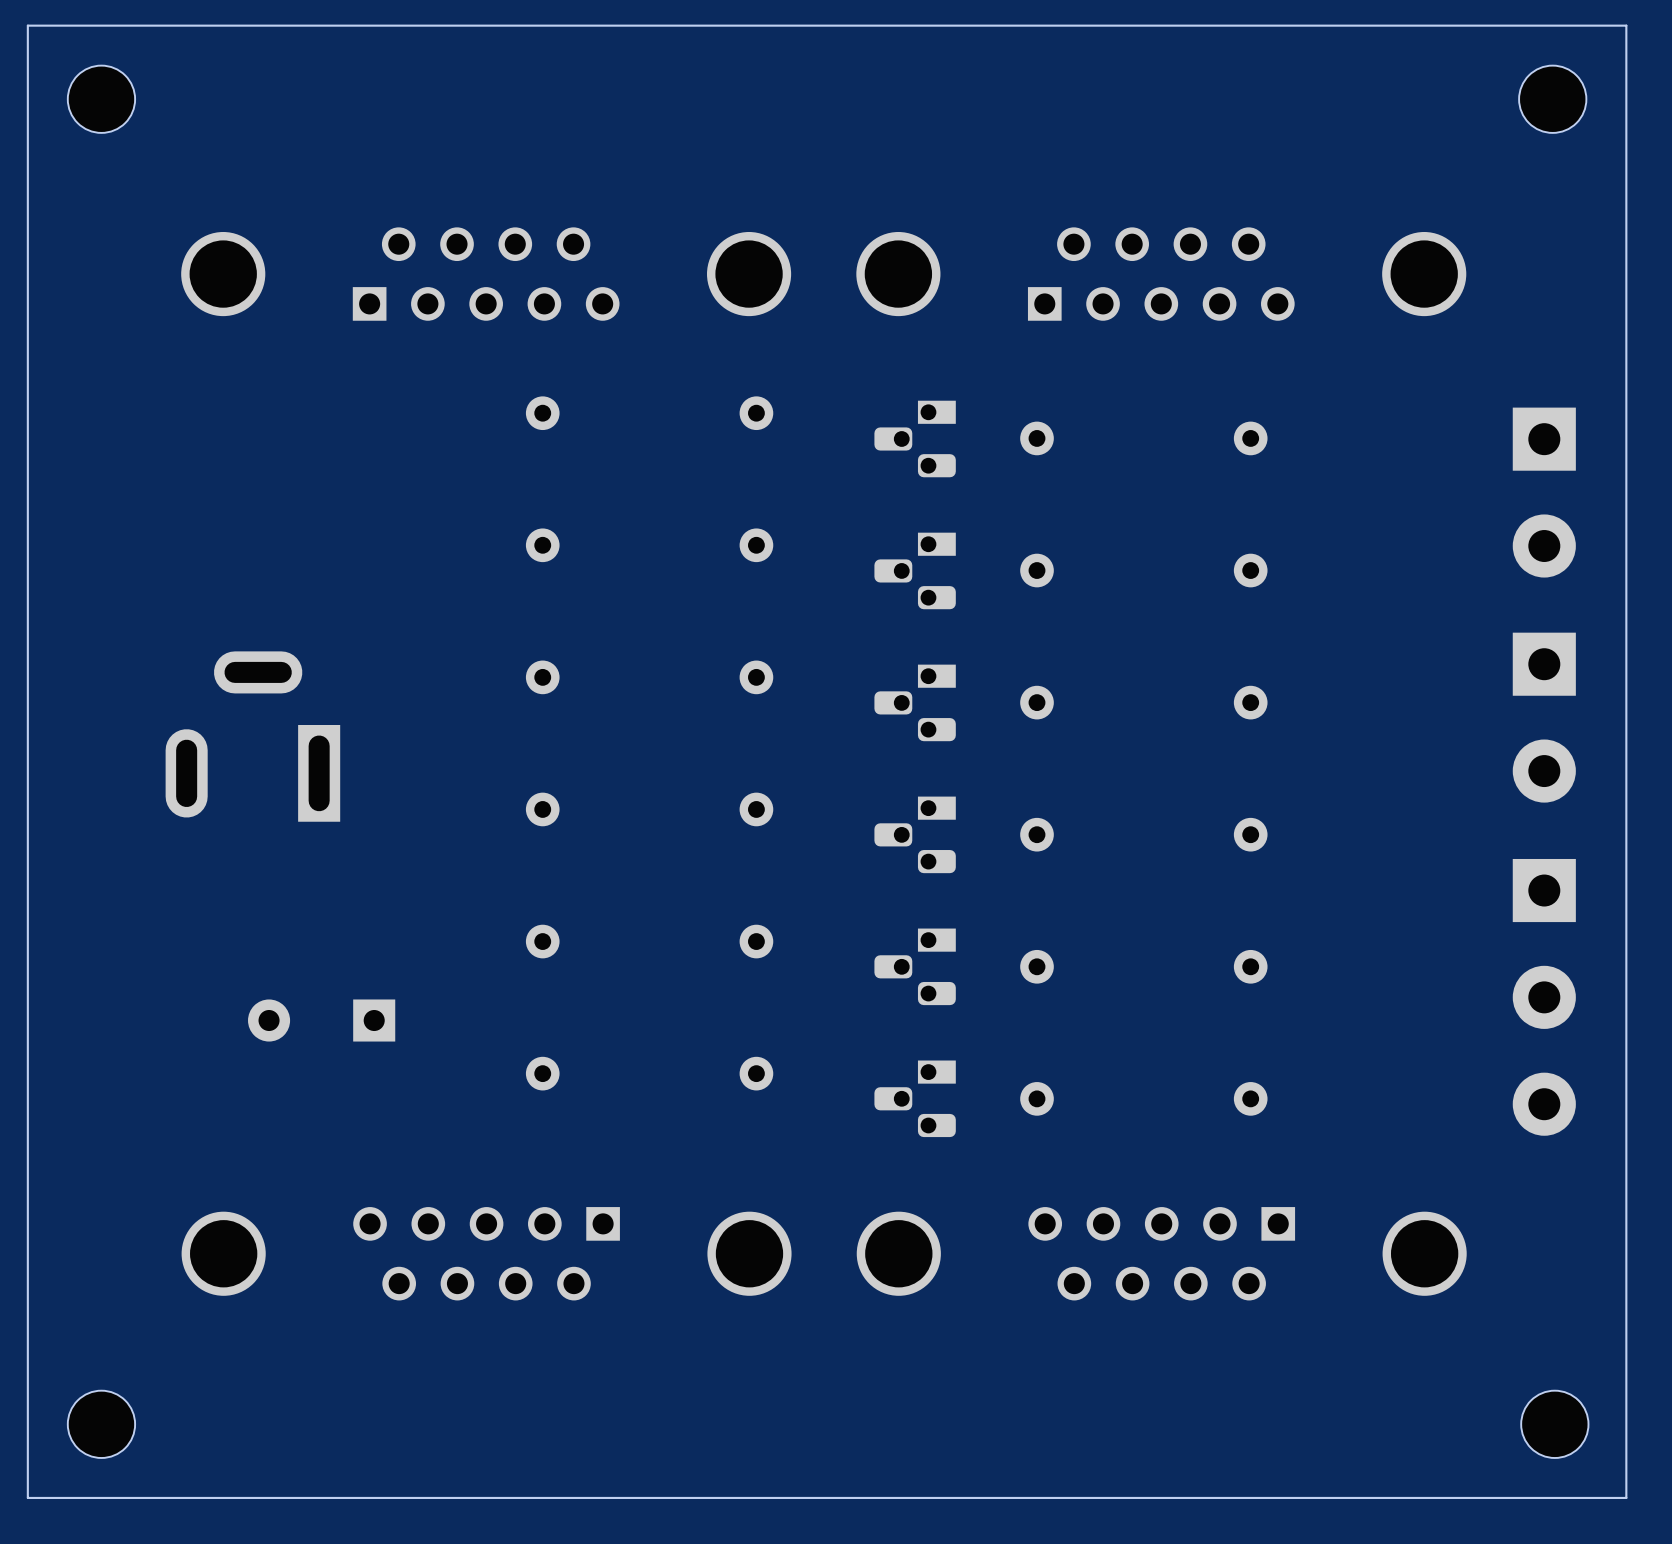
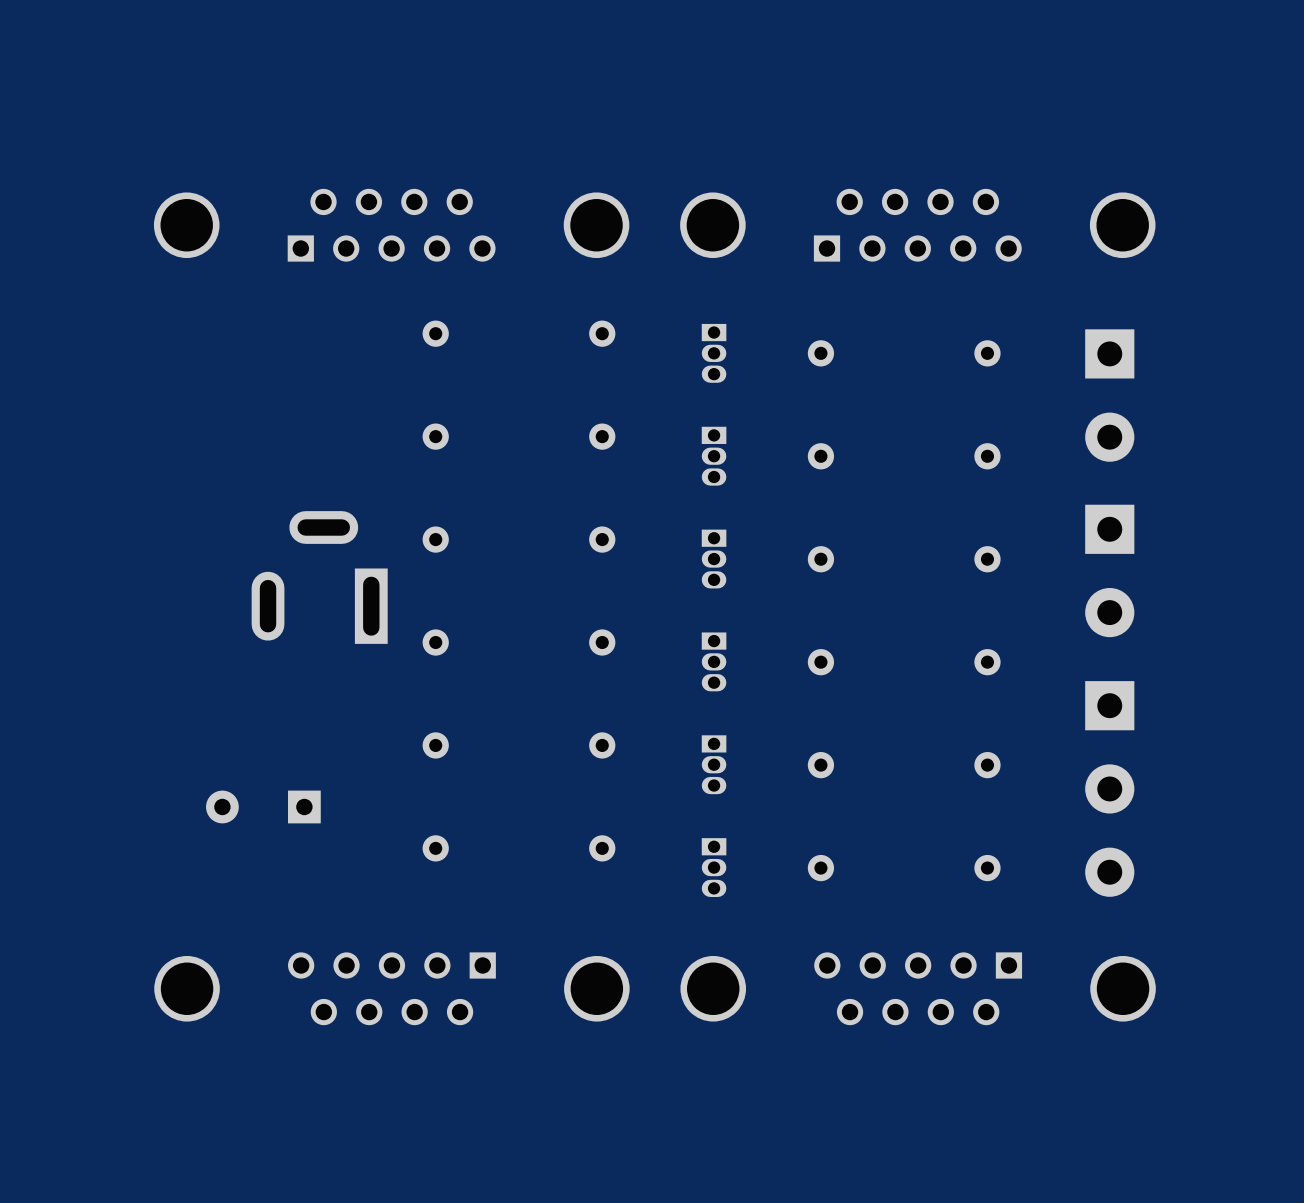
board edge: (1626, 25) (27, 25) (27, 1497) (1626, 1497) (1626, 25) -> none
part: (101, 99) -> none
part: (1552, 99) -> none
part footprint: [874, 400, 956, 478] -> [701, 323, 727, 383]
part: none -> (1109, 395)
part: (1544, 492) -> none
part footprint: [874, 532, 956, 610] -> [701, 426, 727, 486]
part footprint: [874, 664, 956, 742] -> [701, 529, 727, 589]
part: none -> (1109, 570)
part: (1544, 717) -> none
part position: (252, 736) -> (319, 577)
part footprint: [874, 796, 956, 874] -> [701, 632, 727, 692]
part footprint: [874, 928, 956, 1006] -> [701, 735, 727, 795]
part position: (1544, 997) -> (1109, 788)
part footprint: [874, 1060, 956, 1138] -> [701, 838, 727, 897]
part: (101, 1424) -> none
part: (1554, 1424) -> none

